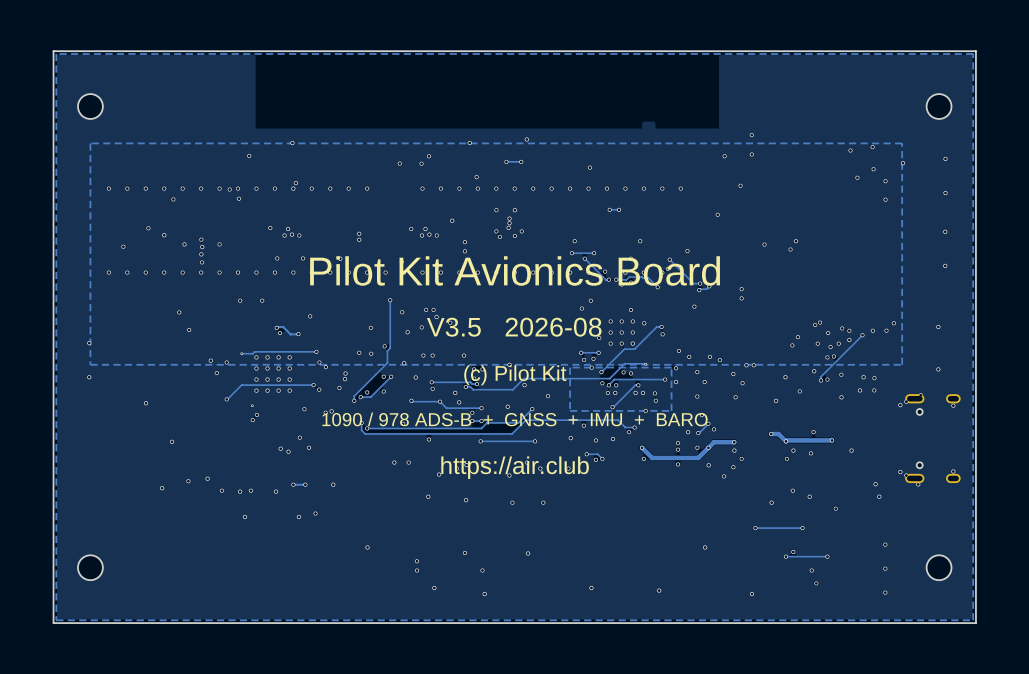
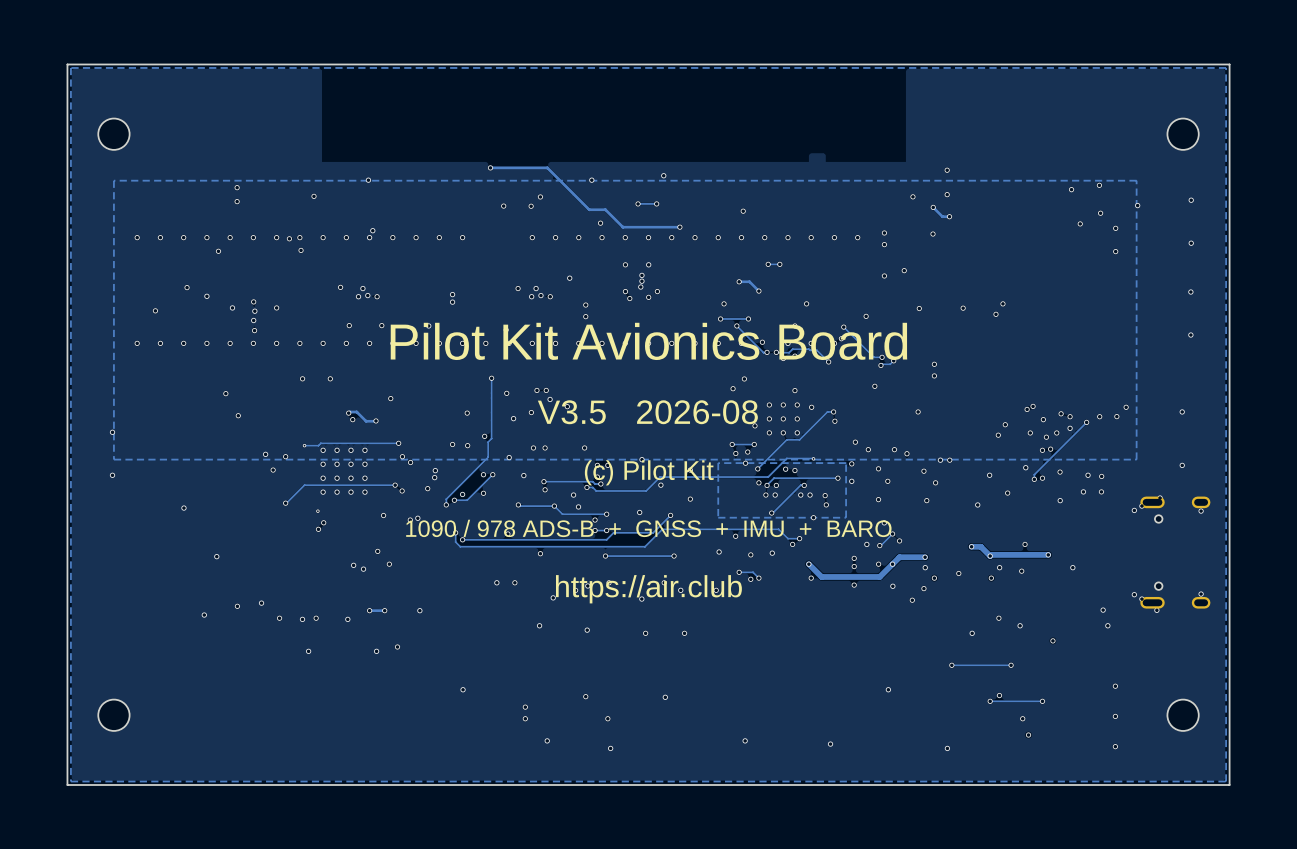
track: none -> (490, 167) (547, 167) (589, 209) (605, 209) (622, 227) (679, 227)
via: none -> (490, 167)
via: none -> (237, 187)
via: none -> (237, 201)
track: none -> (933, 207) (942, 216) (949, 216)
via: none -> (933, 207)
via: none -> (949, 216)
via: none -> (679, 227)
via: none -> (884, 232)
via: none -> (884, 244)
via: none -> (884, 275)
track: none -> (739, 281) (749, 281) (758, 291)
via: none -> (739, 281)
via: none -> (758, 291)
via: none -> (919, 308)
via: none -> (918, 411)
via: none -> (958, 573)

